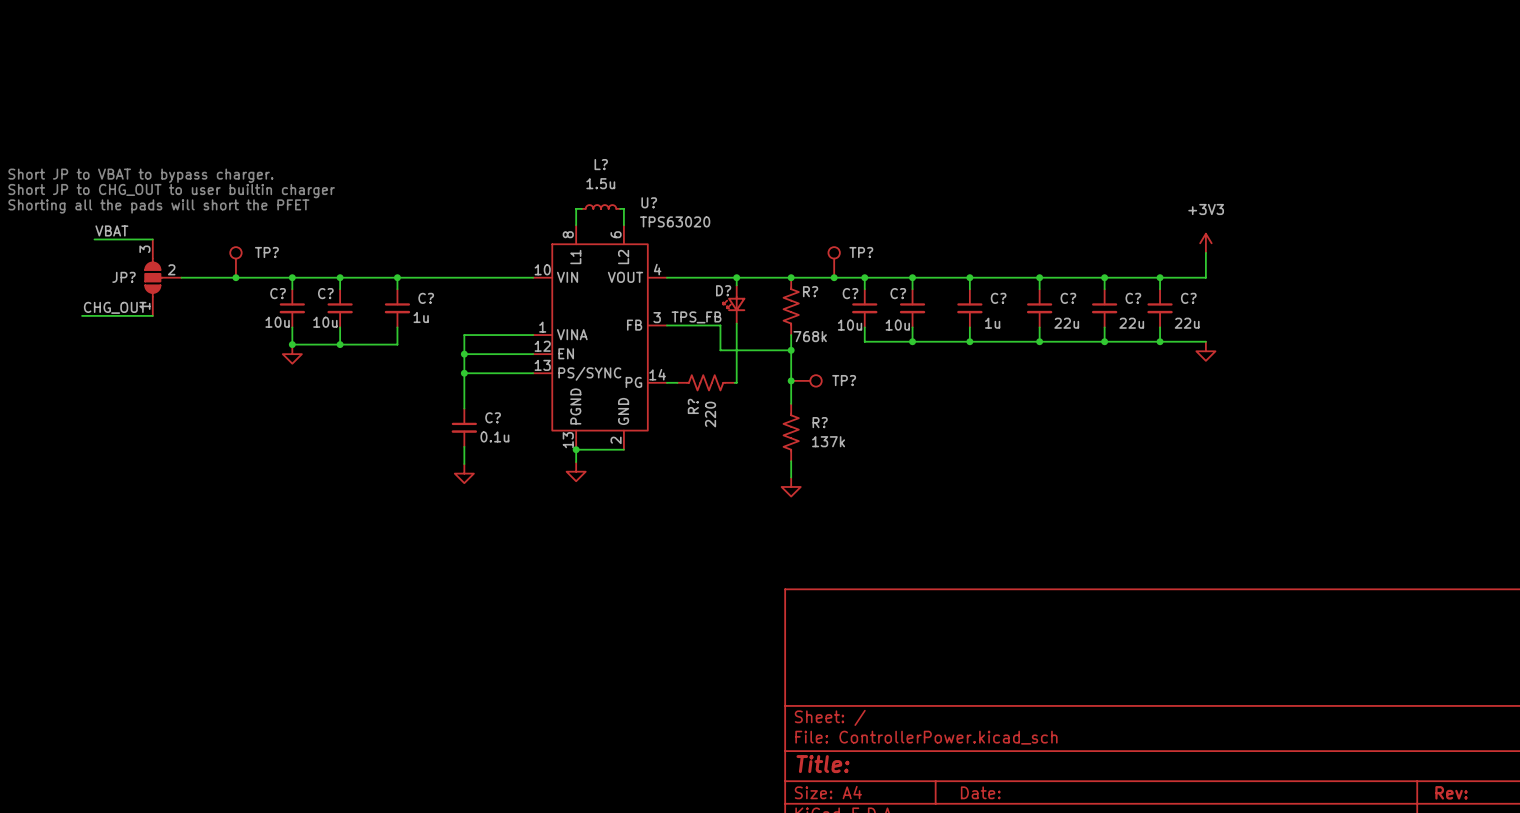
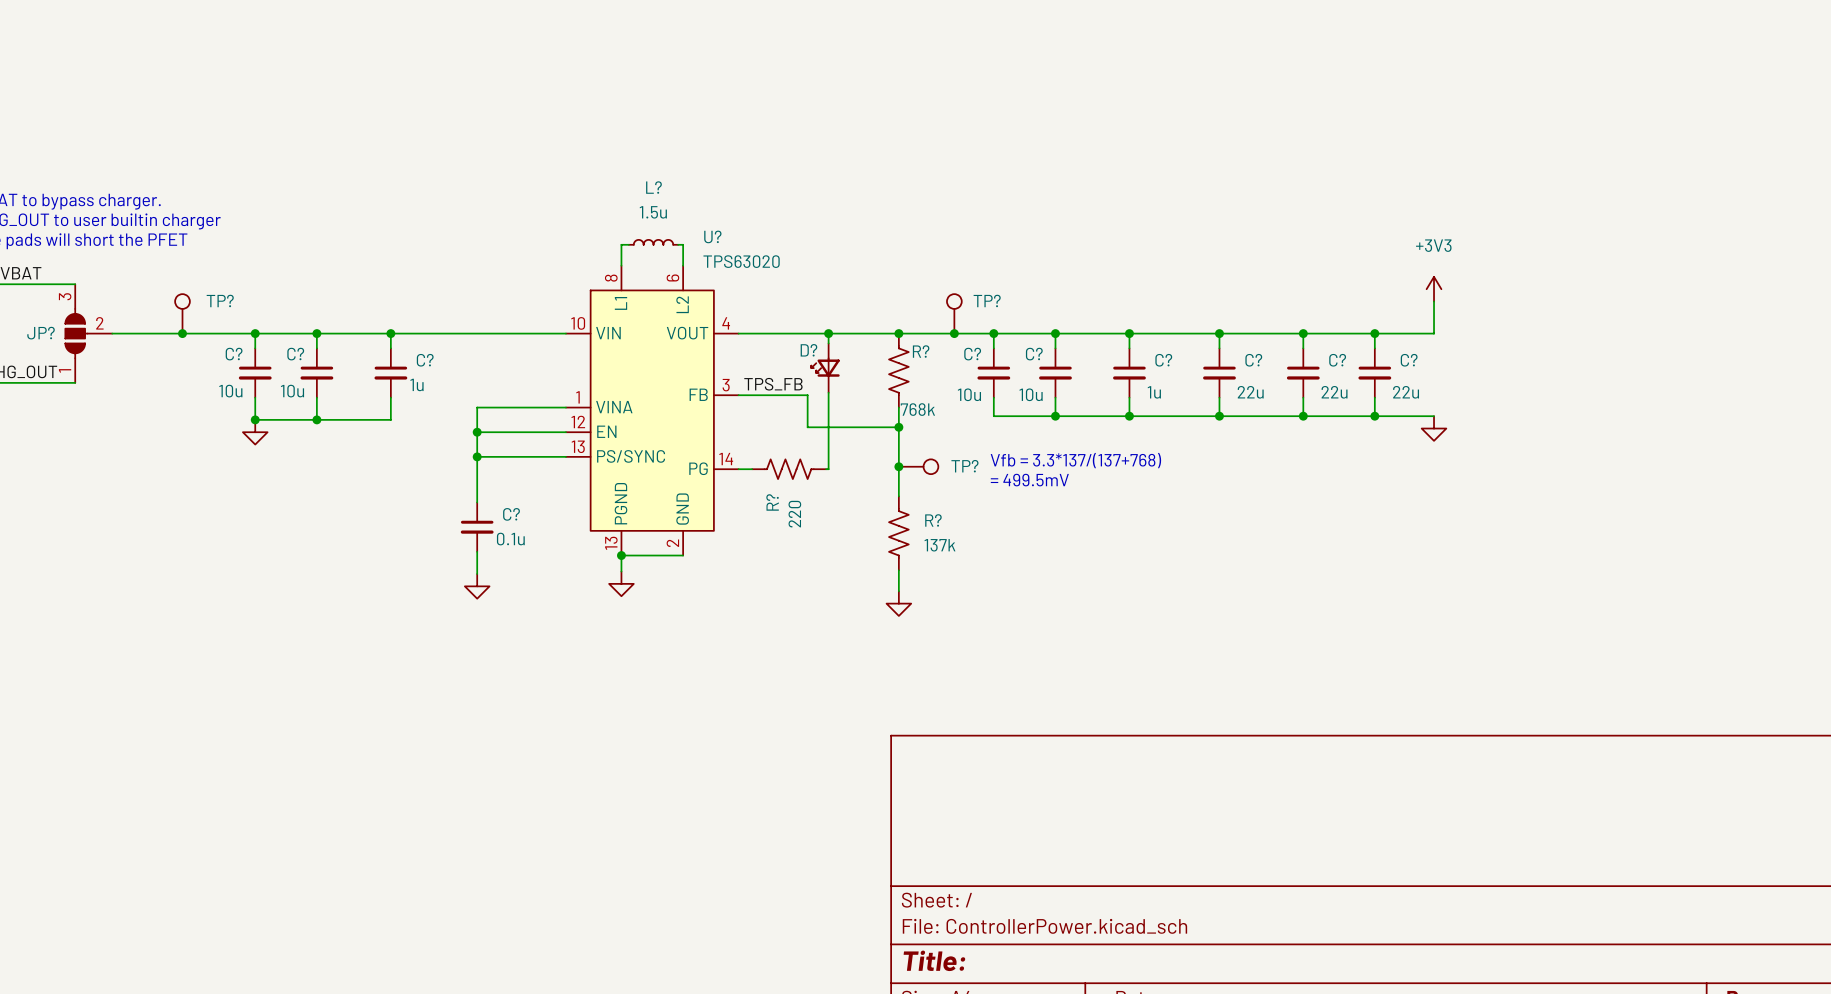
text: none -> Vfb = 3.3*137/(137+768) (1075, 460)
text: none -> = 499.5mV (1029, 480)

